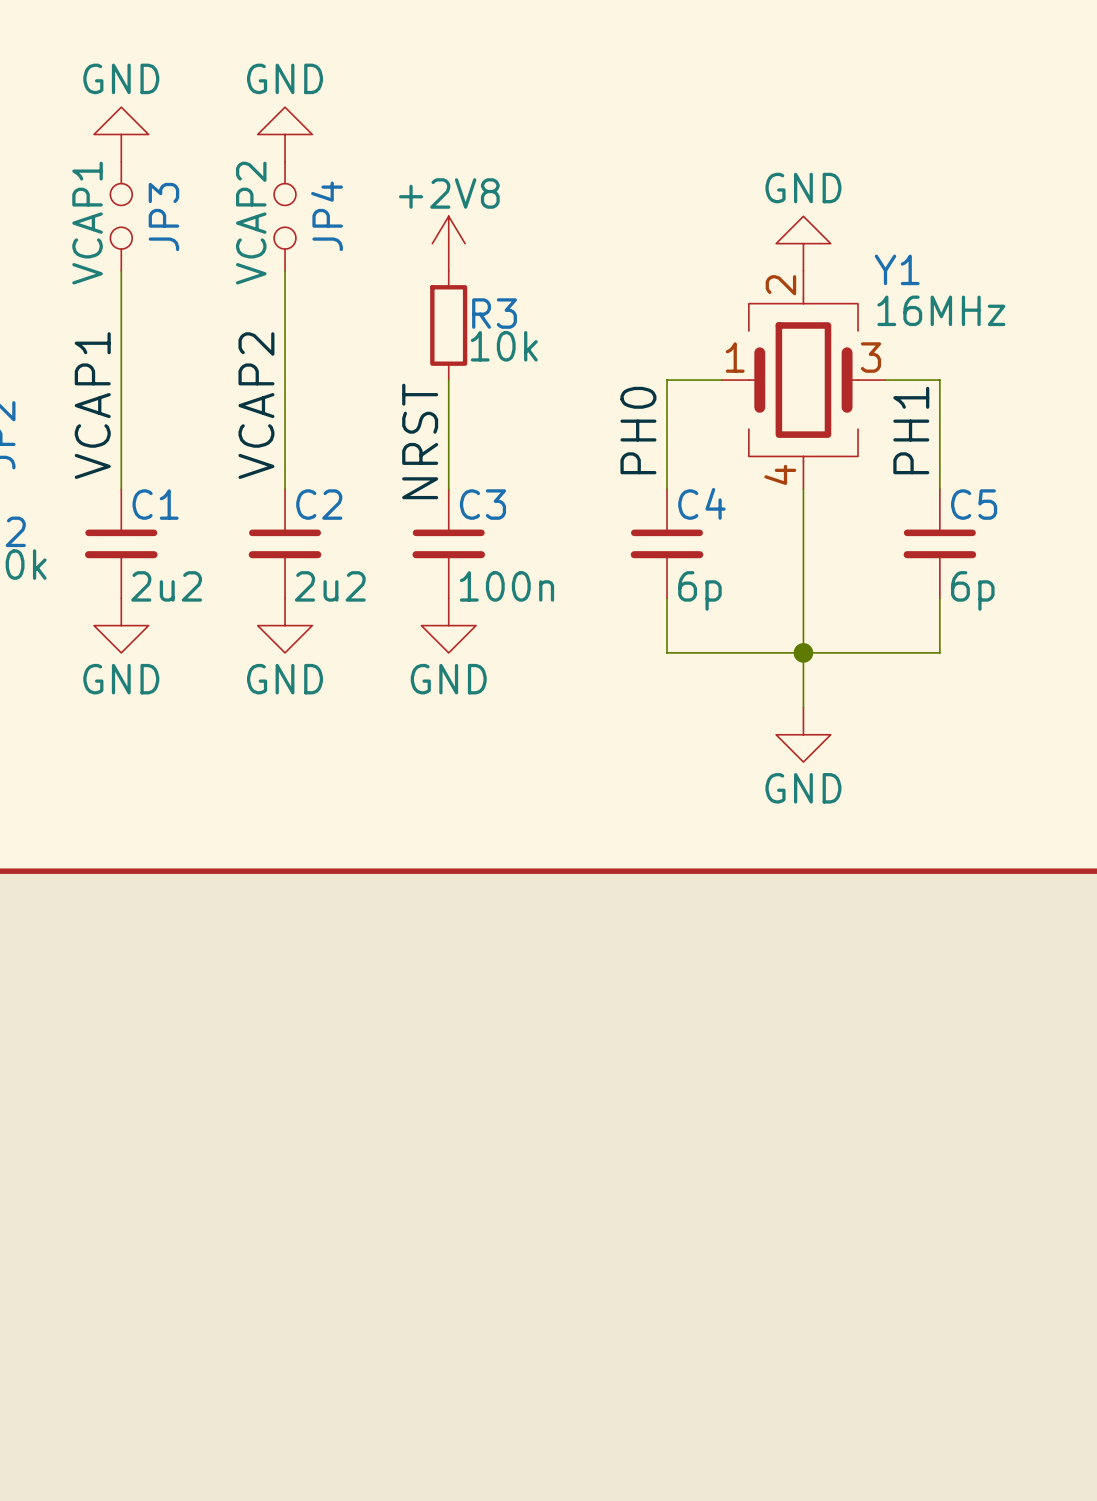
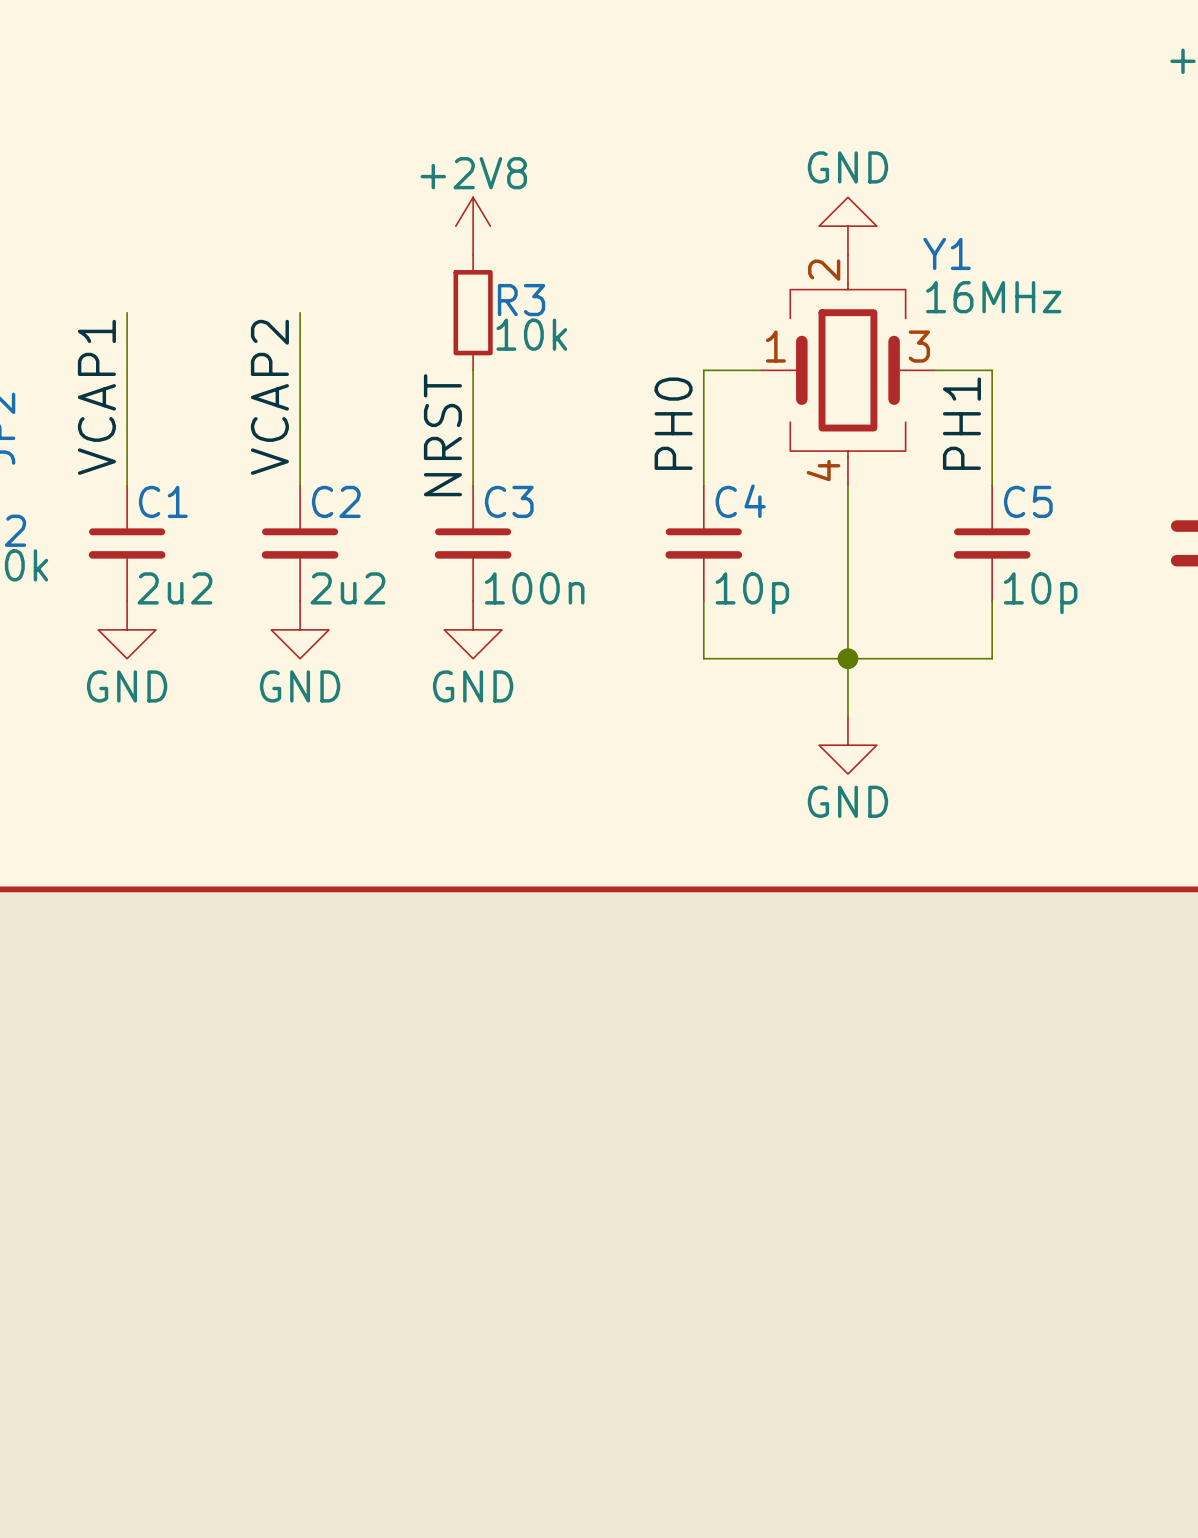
power symbol: GND (121, 134) -> none
power symbol: GND (285, 134) -> none
JP3: VCAP1 (121, 216) -> none
JP4: VCAP2 (285, 216) -> none
wire: (121, 270) (121, 325) -> none
wire: (285, 270) (285, 325) -> none
C4 value: 6p (699, 590) -> 10p (752, 593)
C5 value: 6p (972, 590) -> 10p (1040, 593)

